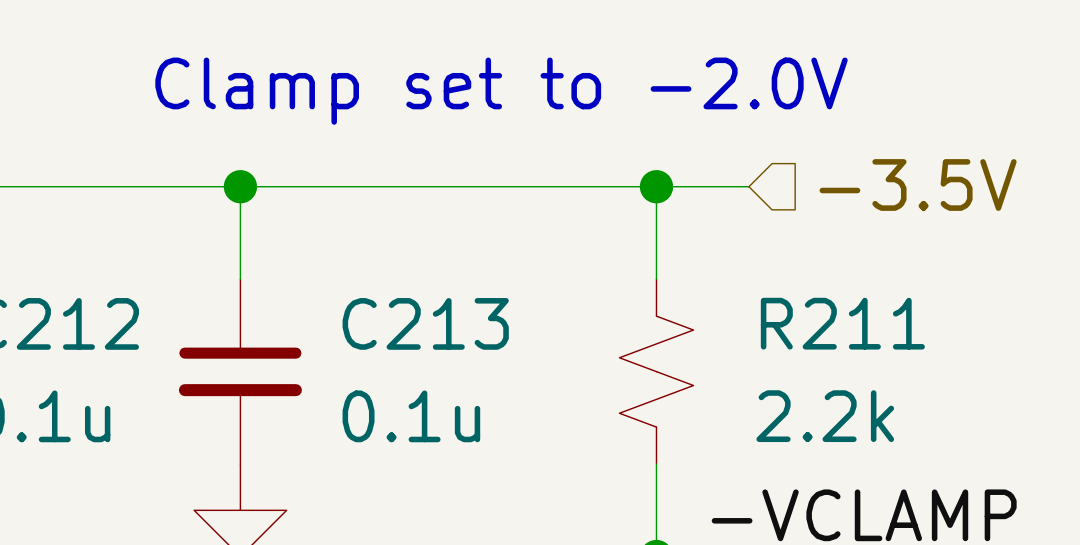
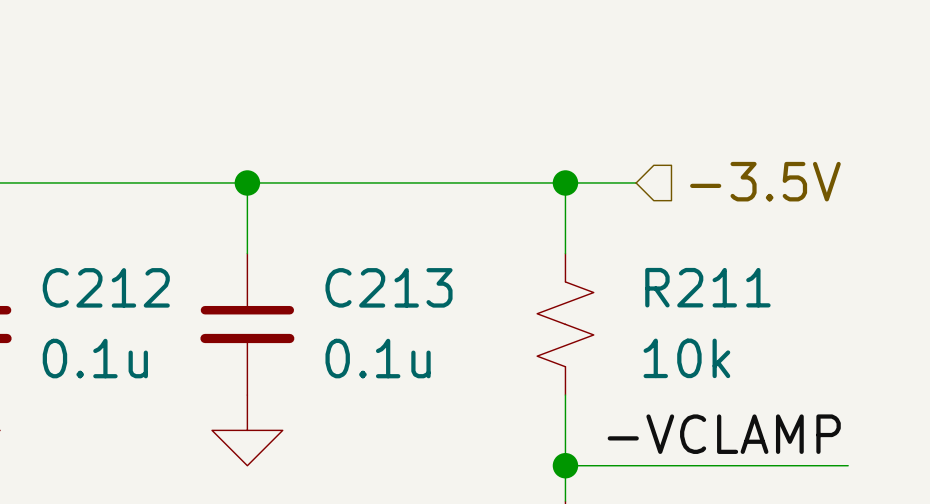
text: Clamp set to -2.0V (501, 91) -> none
R211 value: 2.2k (825, 416) -> 10k (686, 358)

